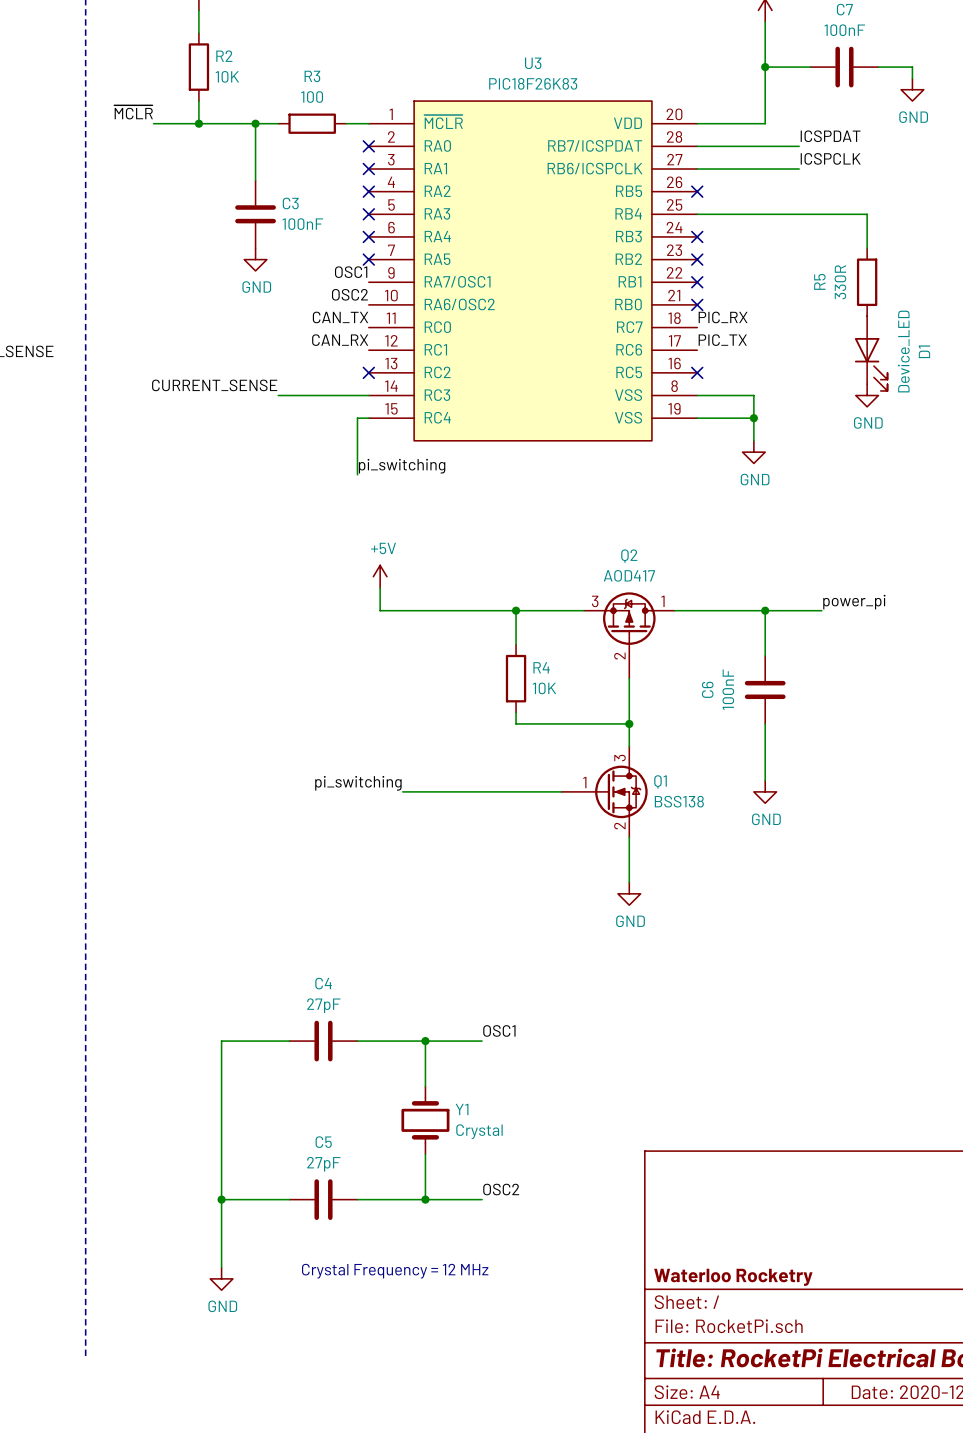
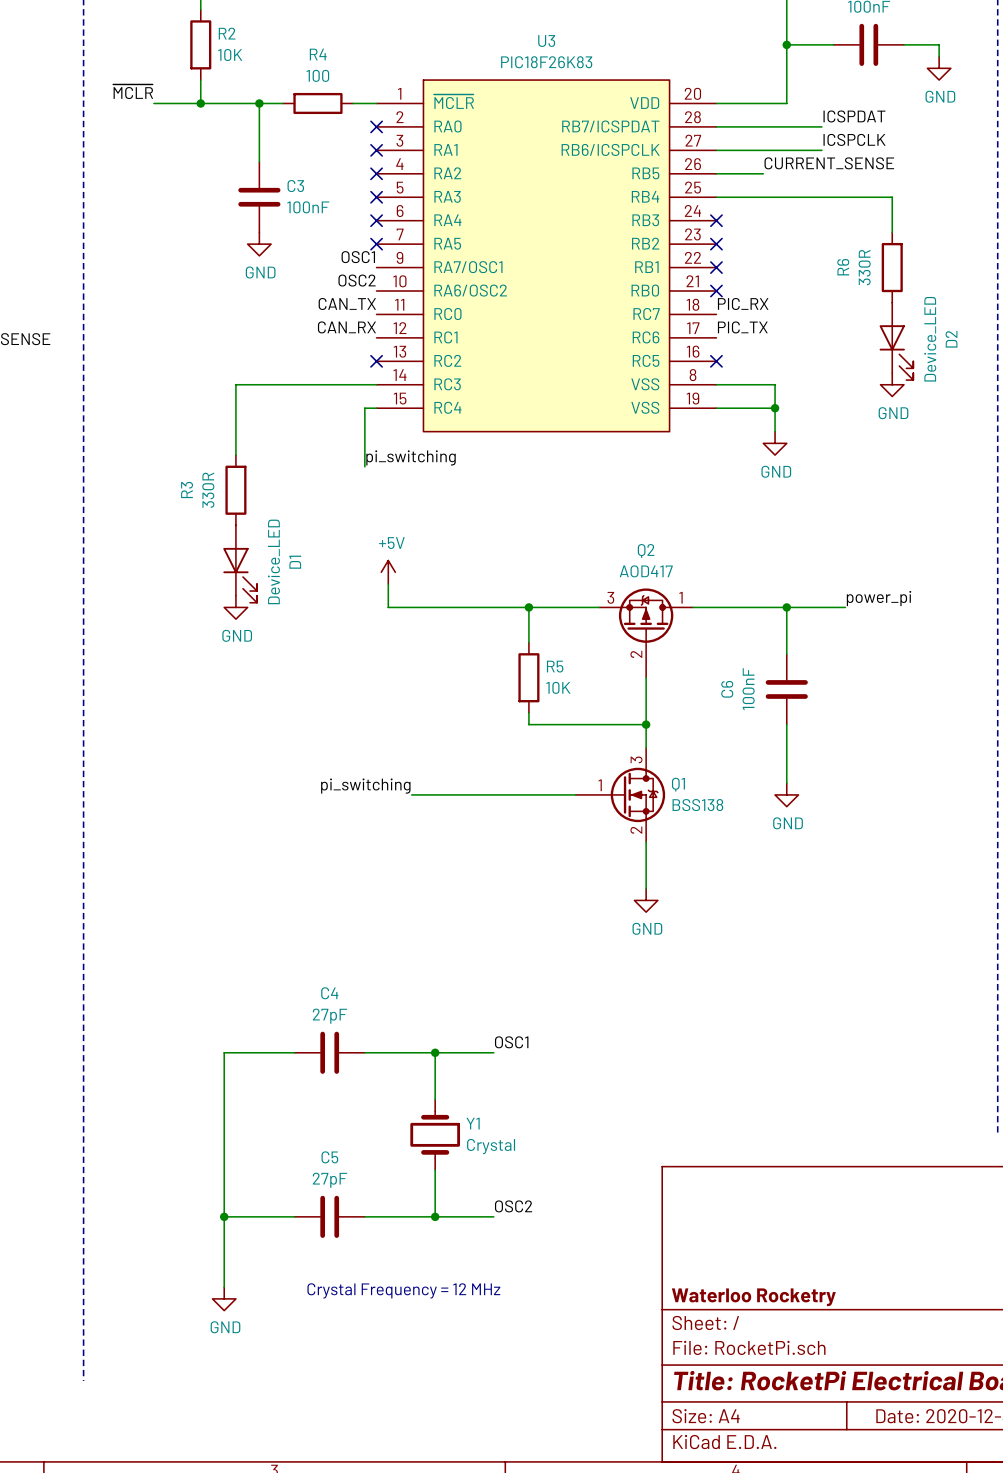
R3 name: R3 (312, 76) -> R4 (318, 54)
label: none -> CURRENT_SENSE (829, 163)
wire: none -> (716, 173) (763, 173)
no-connect mark: (697, 191) -> none
R5 name: R5 (819, 281) -> R6 (843, 267)
D1 name: D1 (924, 351) -> D2 (951, 339)
label: CURRENT_SENSE (214, 385) -> none
wire: none -> (282, 384) (235, 384) (235, 455)
R3: none -> 330R (235, 490)
D1: none -> Device_LED (240, 564)
power symbol: none -> GND (235, 607)
R4 name: R4 (541, 667) -> R5 (555, 666)

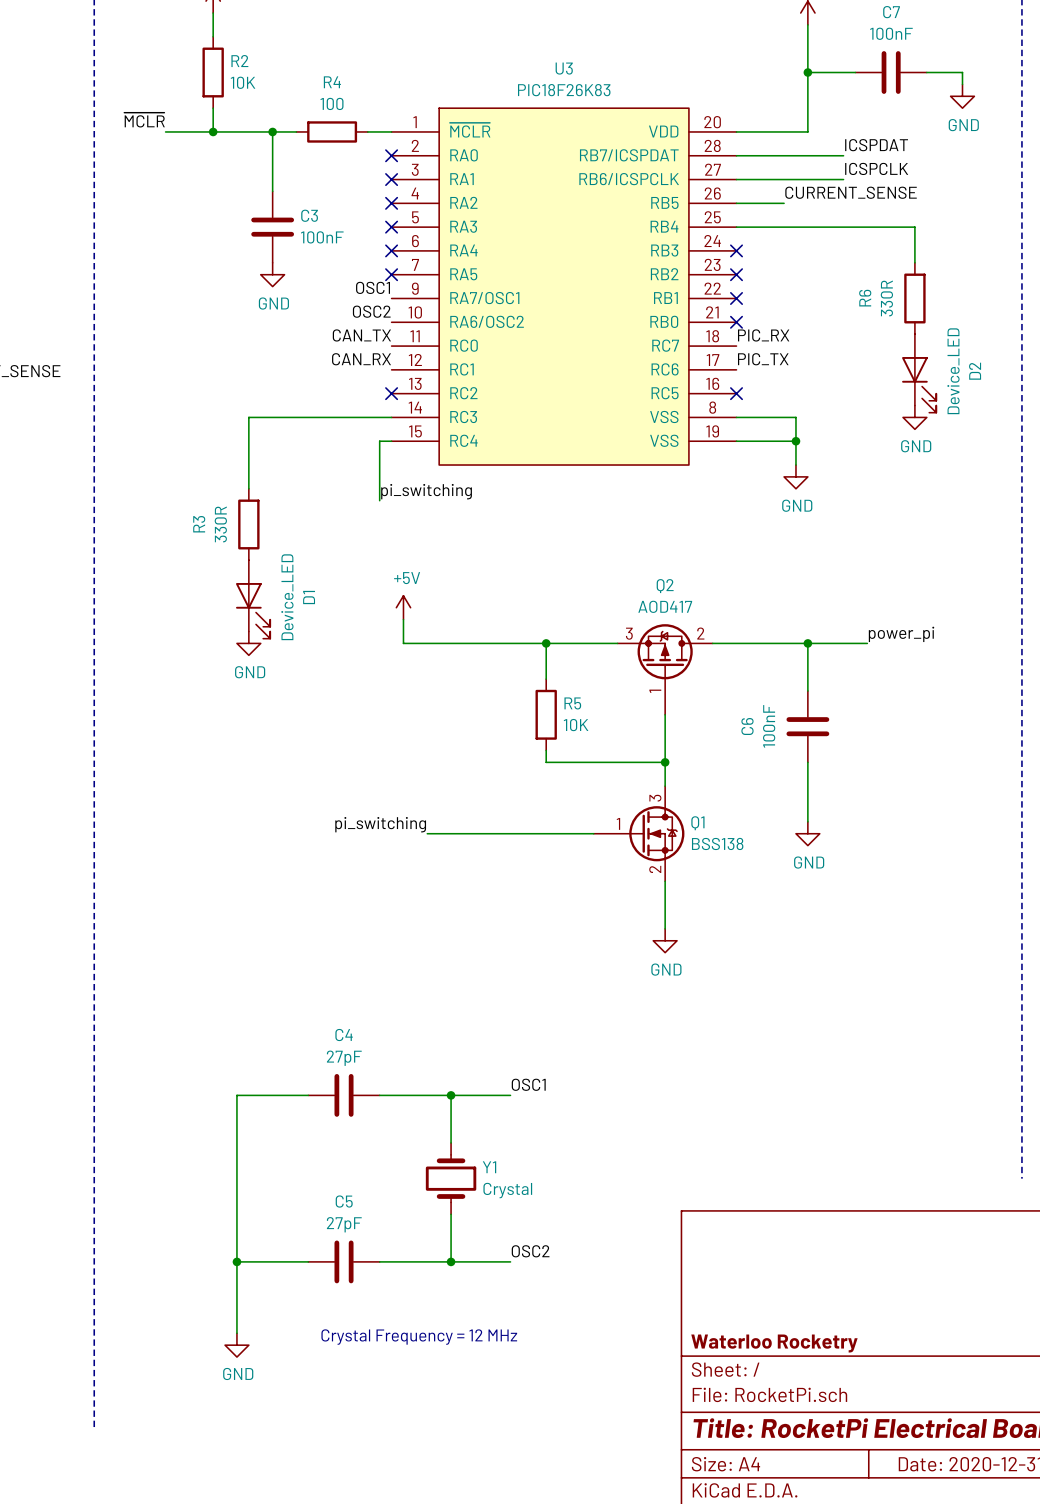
Q2 pin number: 1 (680, 597) -> 2 (700, 633)
Q2 pin number: 2 (636, 654) -> 1 (655, 691)

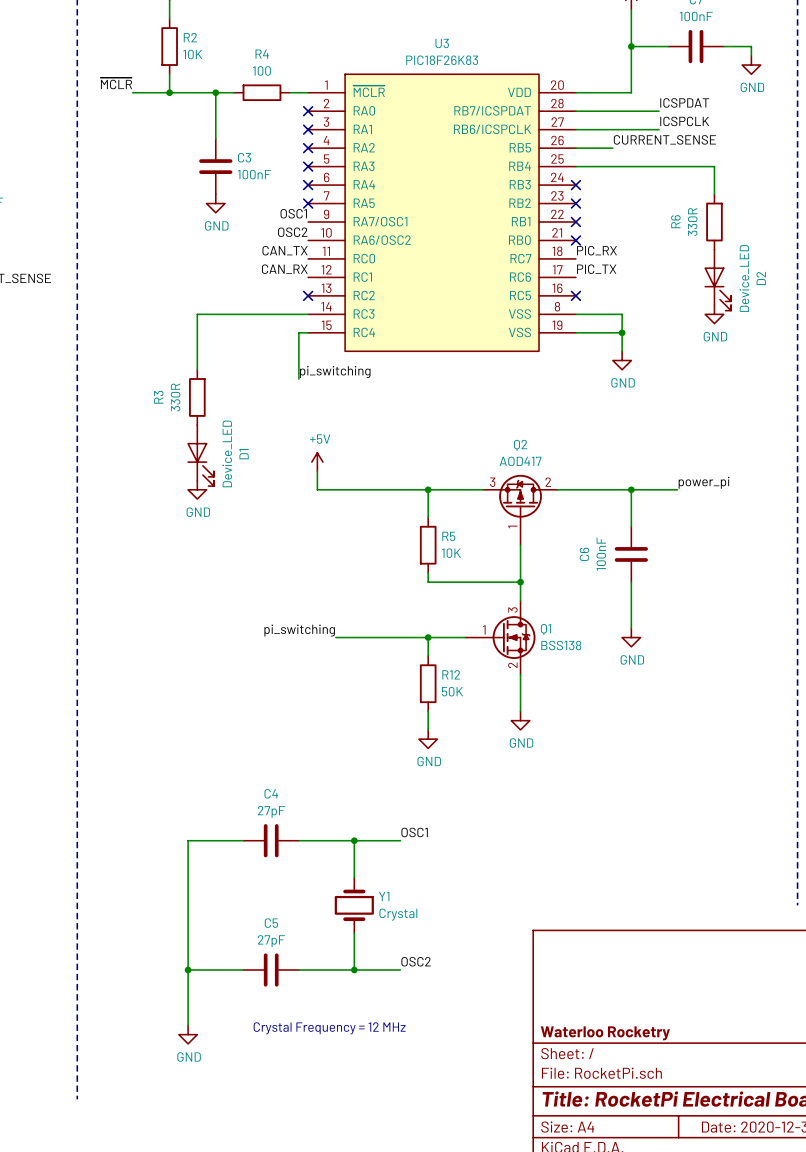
wire: none -> (428, 637) (428, 656)
junction: none -> (428, 637)
R12: none -> 50K (428, 683)
wire: none -> (428, 711) (428, 729)
power symbol: none -> GND (428, 739)

